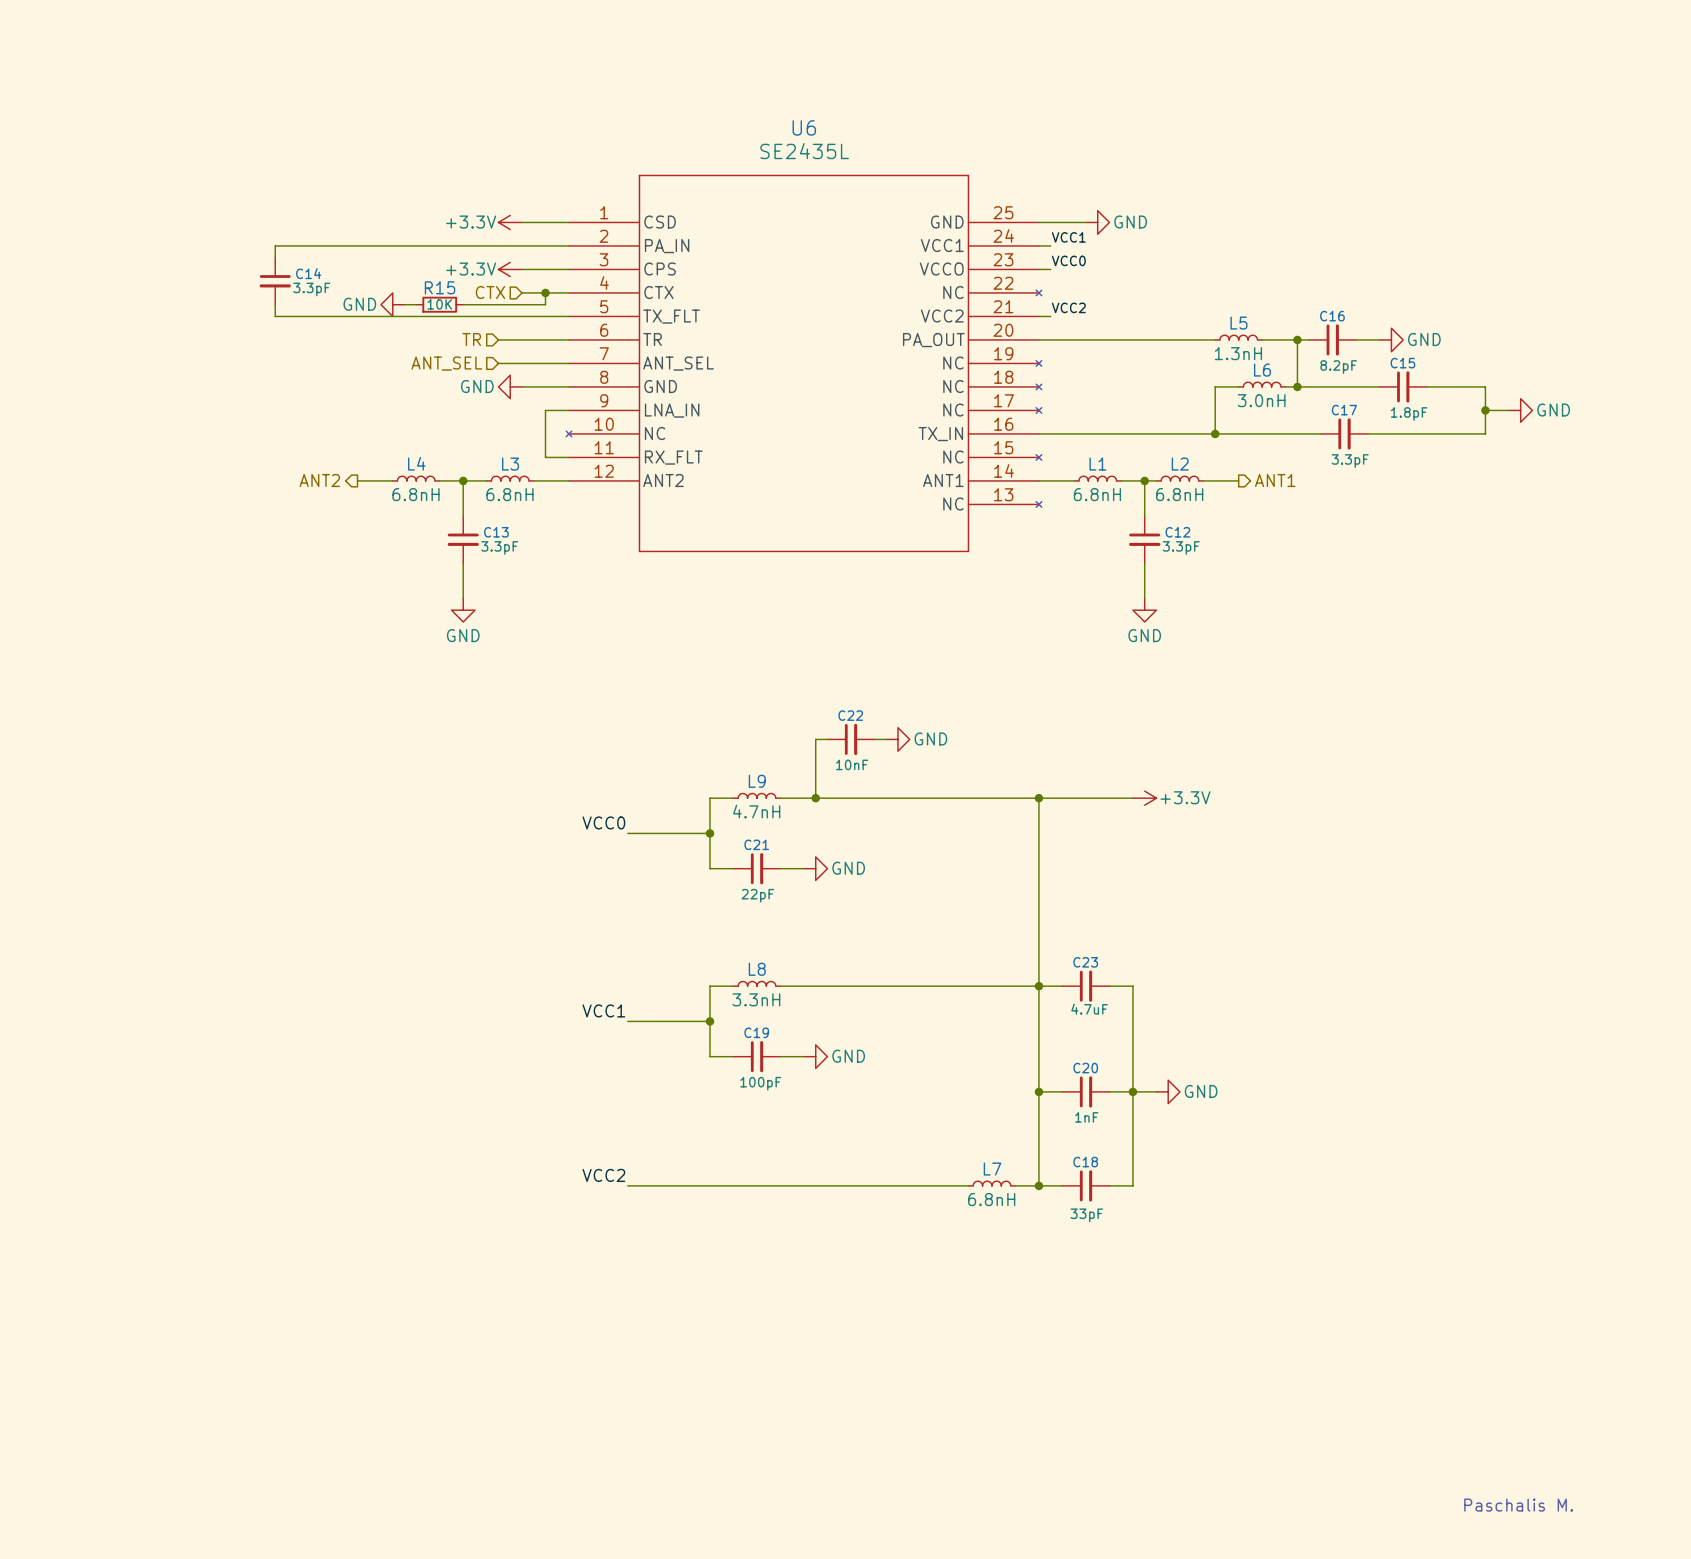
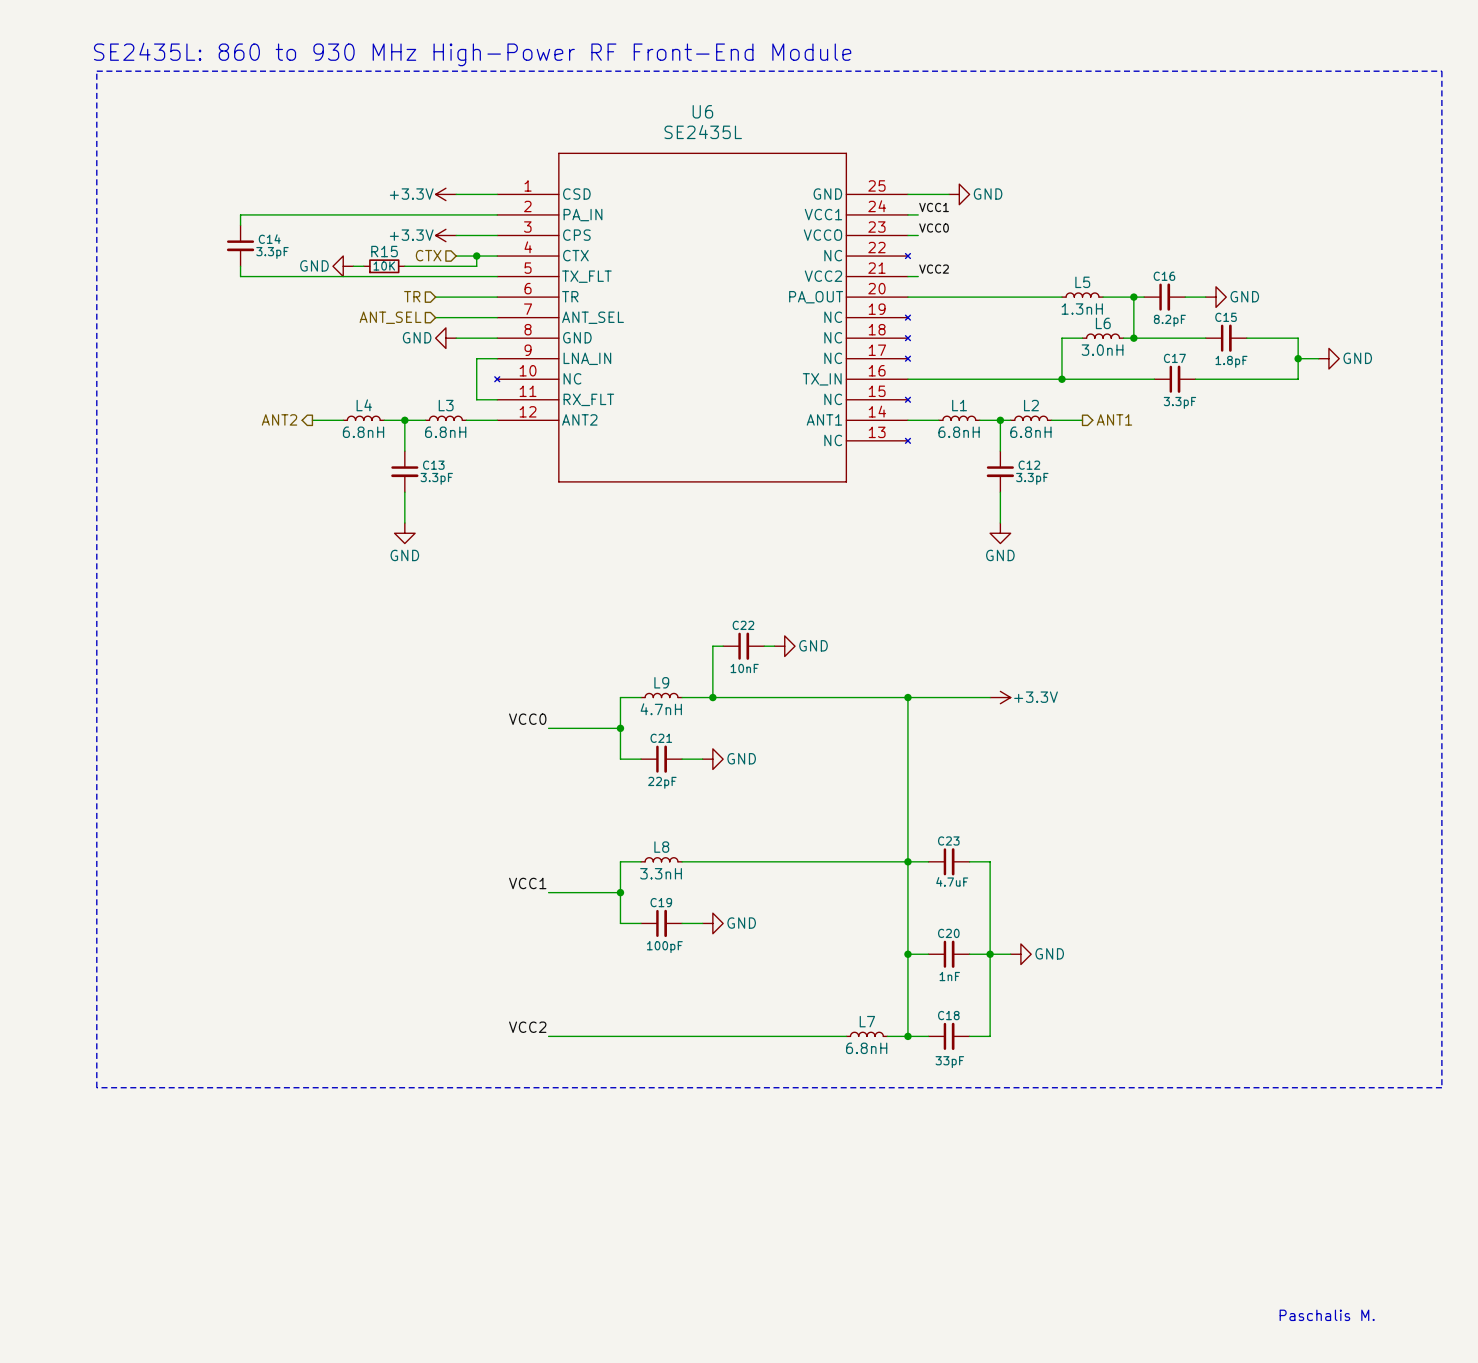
text: none -> SE2435L: 860 to 930 MHz High-Power RF Front-End Module (472, 54)
line: none -> (96, 71) (1441, 71) (1441, 1087) (96, 1087) (96, 71)

